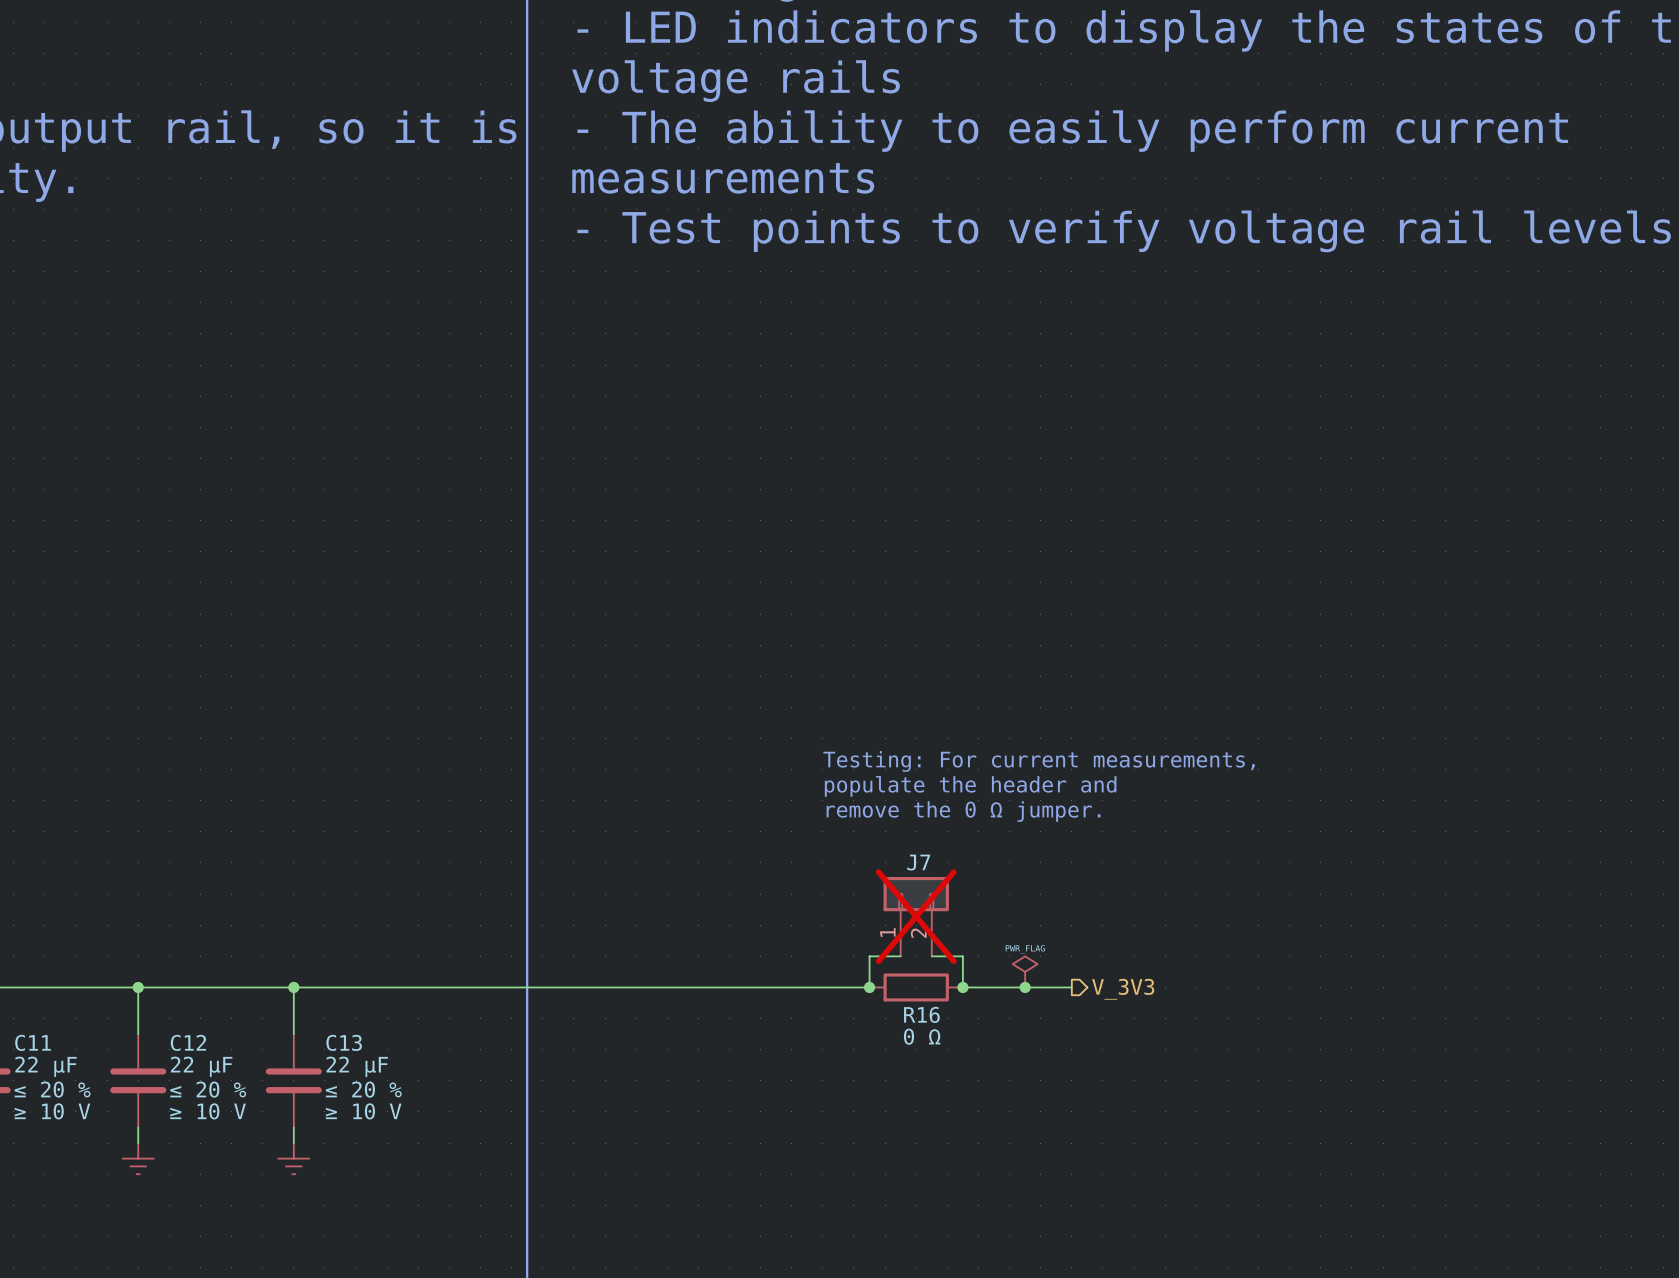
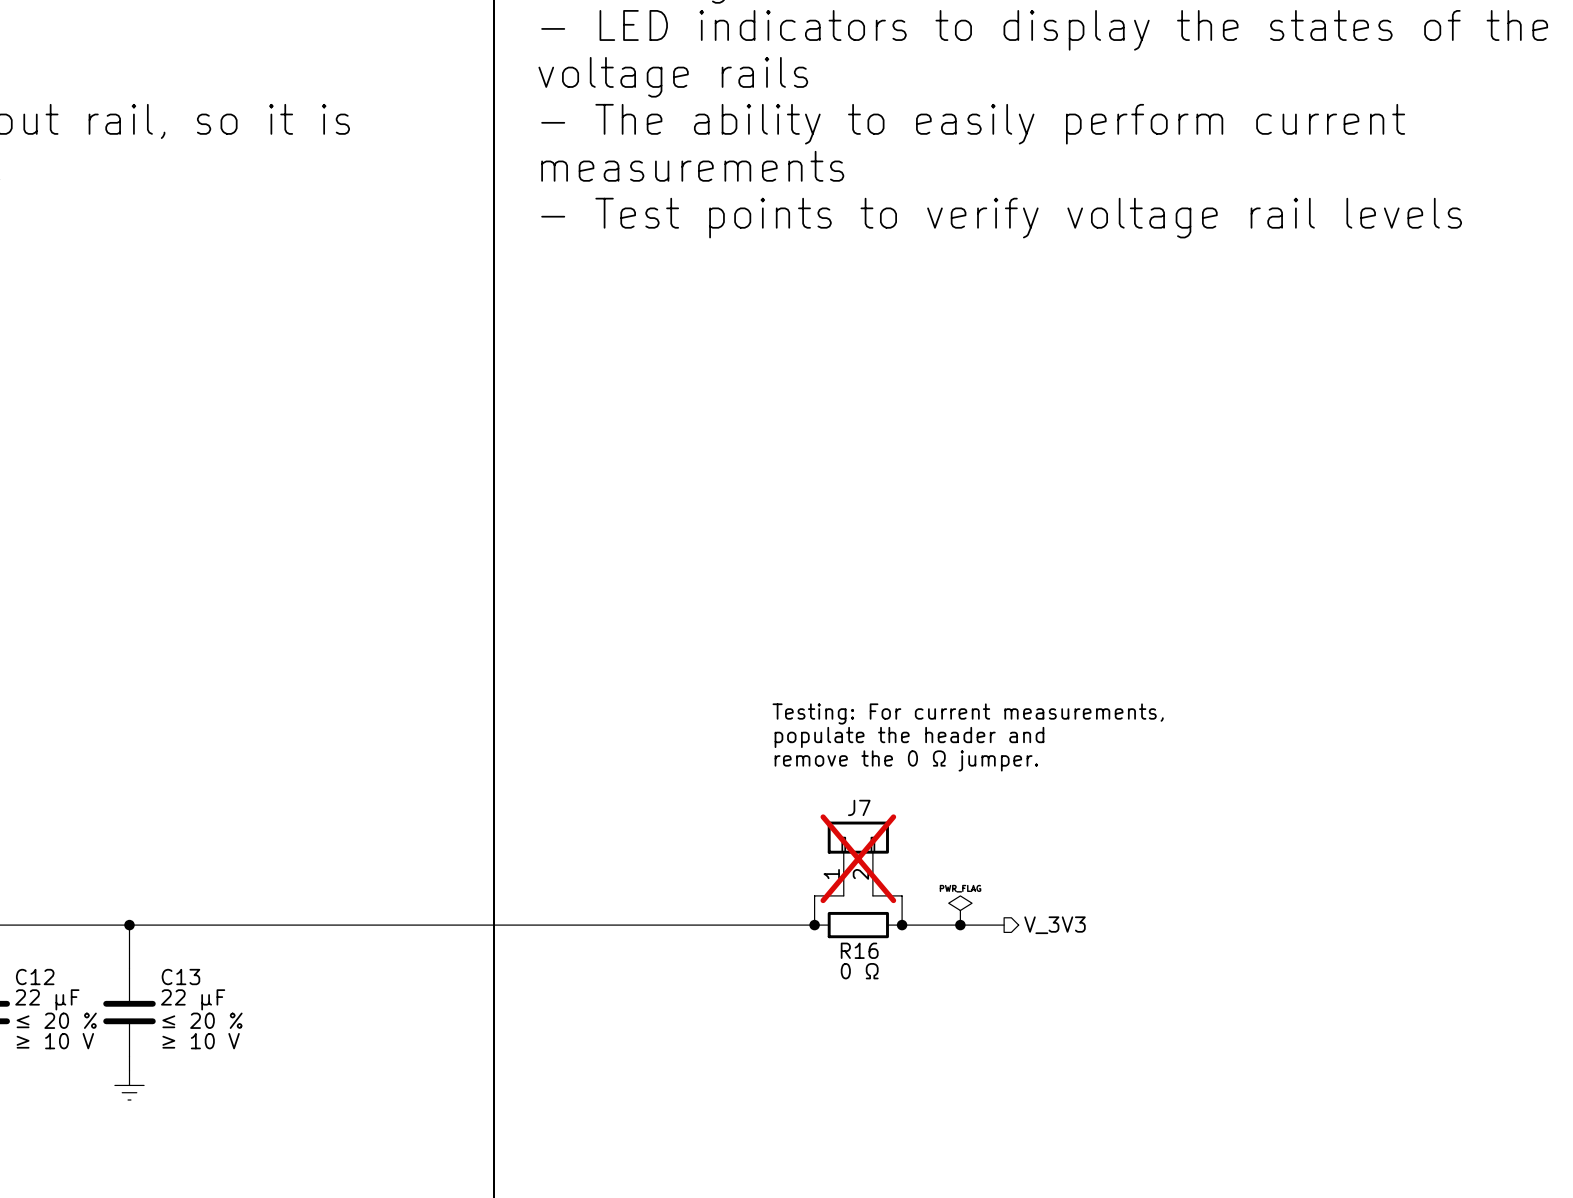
wire: (293, 987) (293, 1034) -> none
junction: (293, 987) -> none
C11 name: C11 (33, 1042) -> C12 (35, 977)
C12 name: C12 (188, 1042) -> C13 (180, 977)
C13: 22 μF (293, 1080) -> none
wire: (293, 1127) (293, 1143) -> none
power symbol: (293, 1158) -> none

